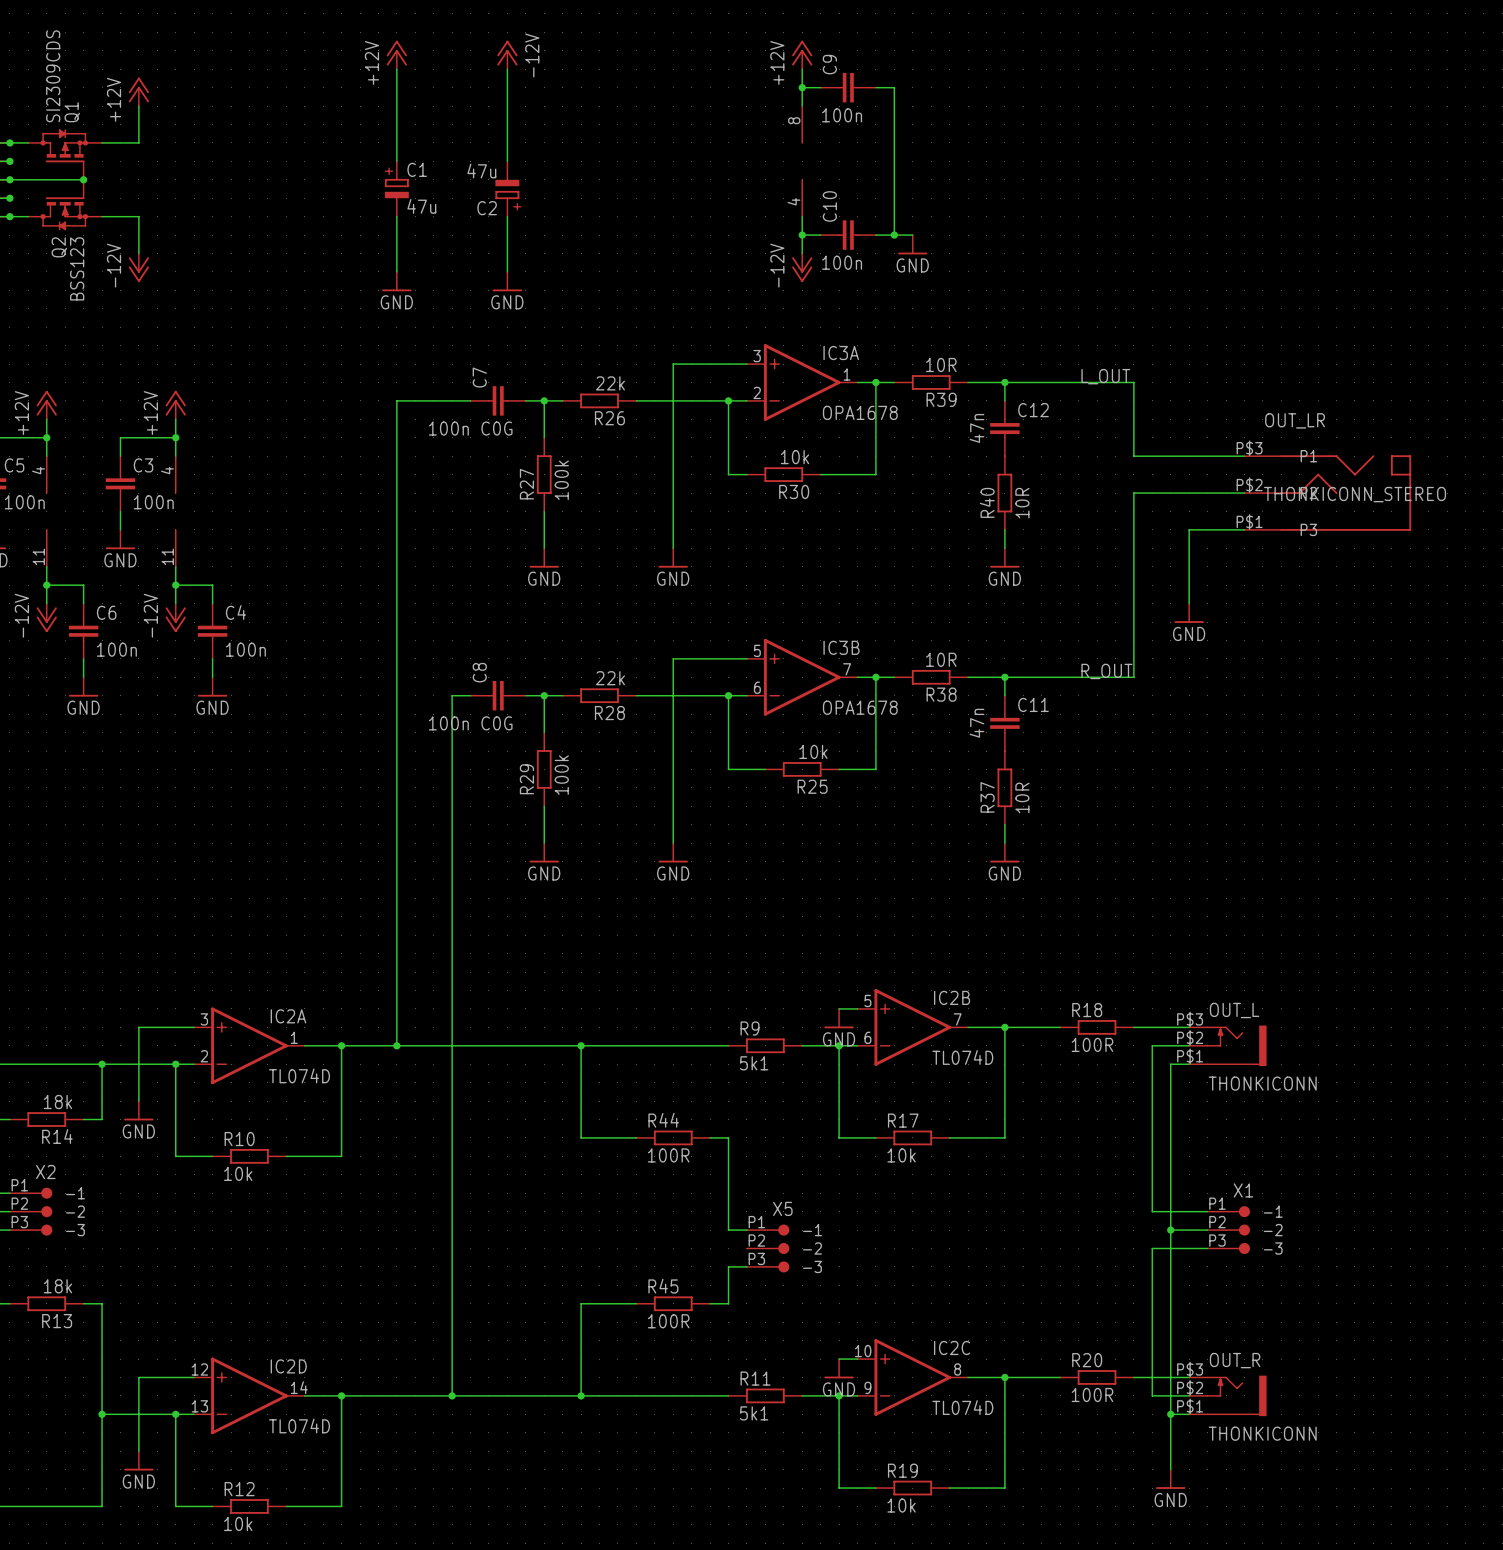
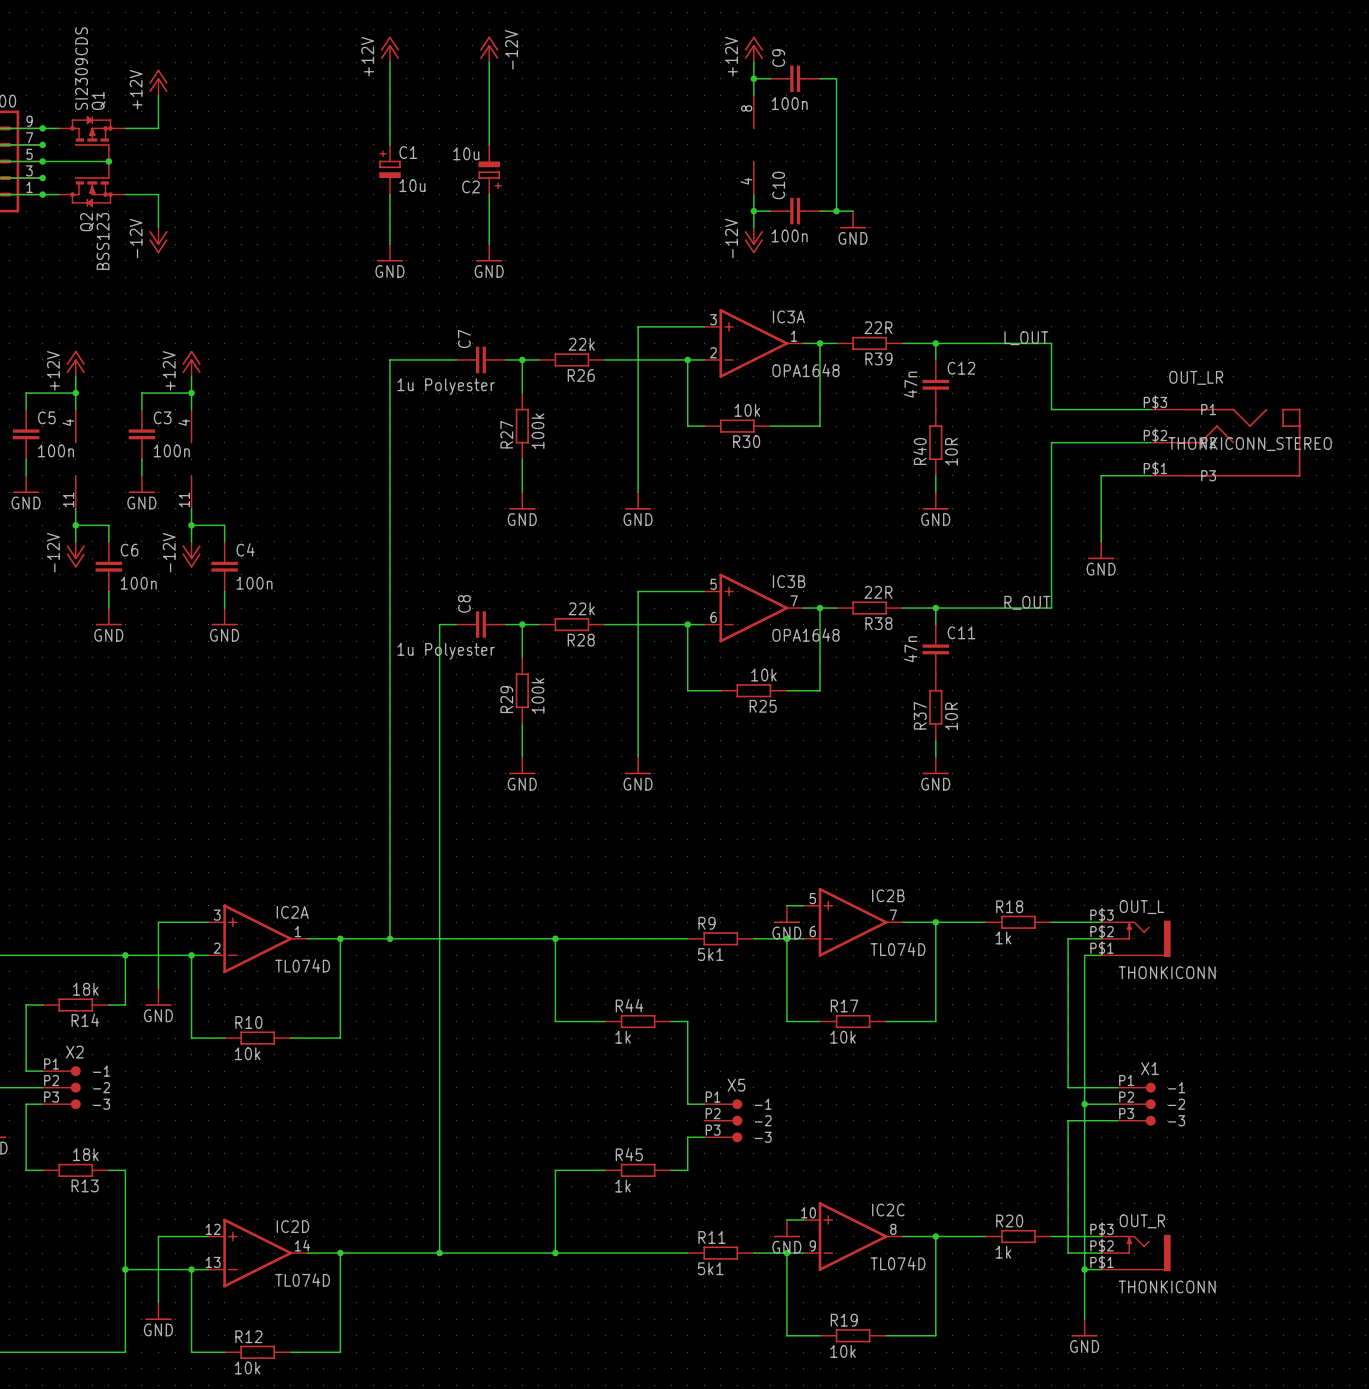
C2 value: 47u (481, 171) -> 10u (466, 153)
C1 value: 47u (421, 206) -> 10u (412, 185)
R39 value: 10R (941, 364) -> 22R (878, 327)
IC3A value: OPA1678 (860, 412) -> OPA1648 (805, 370)
C7 value: 100n C0G (470, 428) -> 1u Polyester (446, 386)
R38 value: 10R (941, 659) -> 22R (878, 592)
IC3B value: OPA1678 (860, 707) -> OPA1648 (805, 635)
C8 value: 100n C0G (470, 723) -> 1u Polyester (446, 651)
R18 value: 100R (1092, 1044) -> 1k (1003, 937)
R44 value: 100R (668, 1155) -> 1k (623, 1037)
R45 value: 100R (668, 1321) -> 1k (623, 1186)
R20 value: 100R (1092, 1394) -> 1k (1003, 1252)

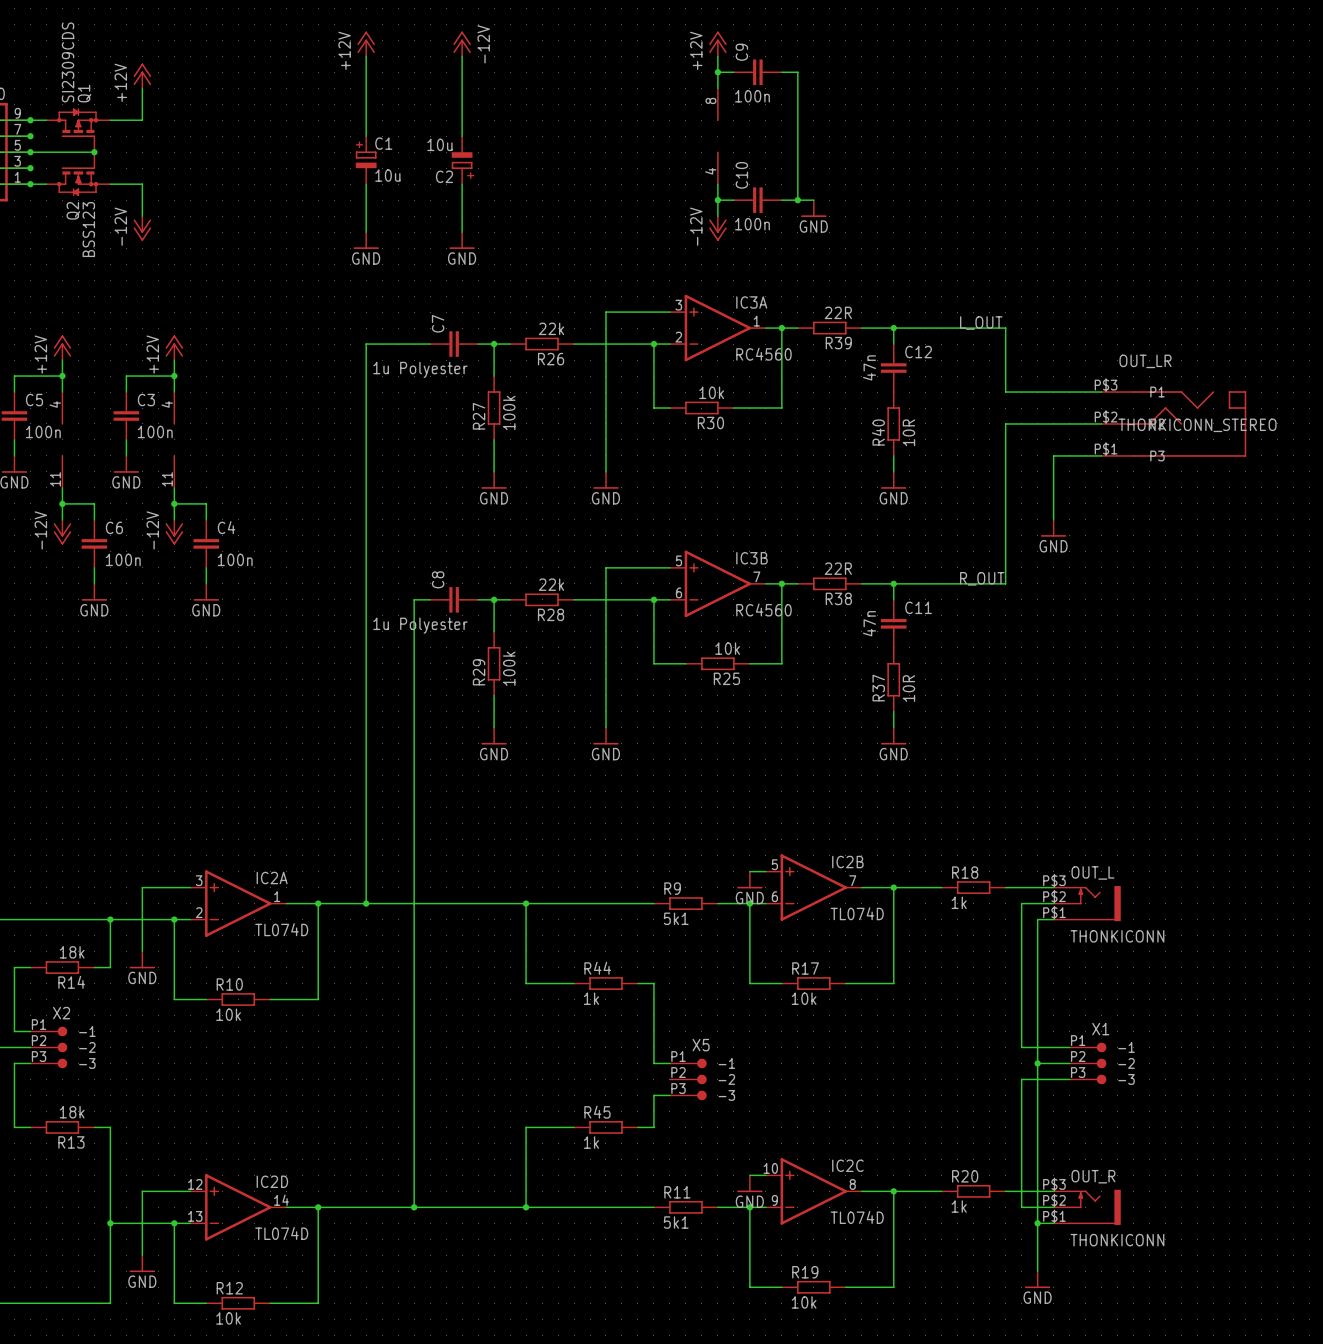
IC3A value: OPA1648 (805, 370) -> RC4560 (763, 354)
IC3B value: OPA1648 (805, 635) -> RC4560 (763, 609)

